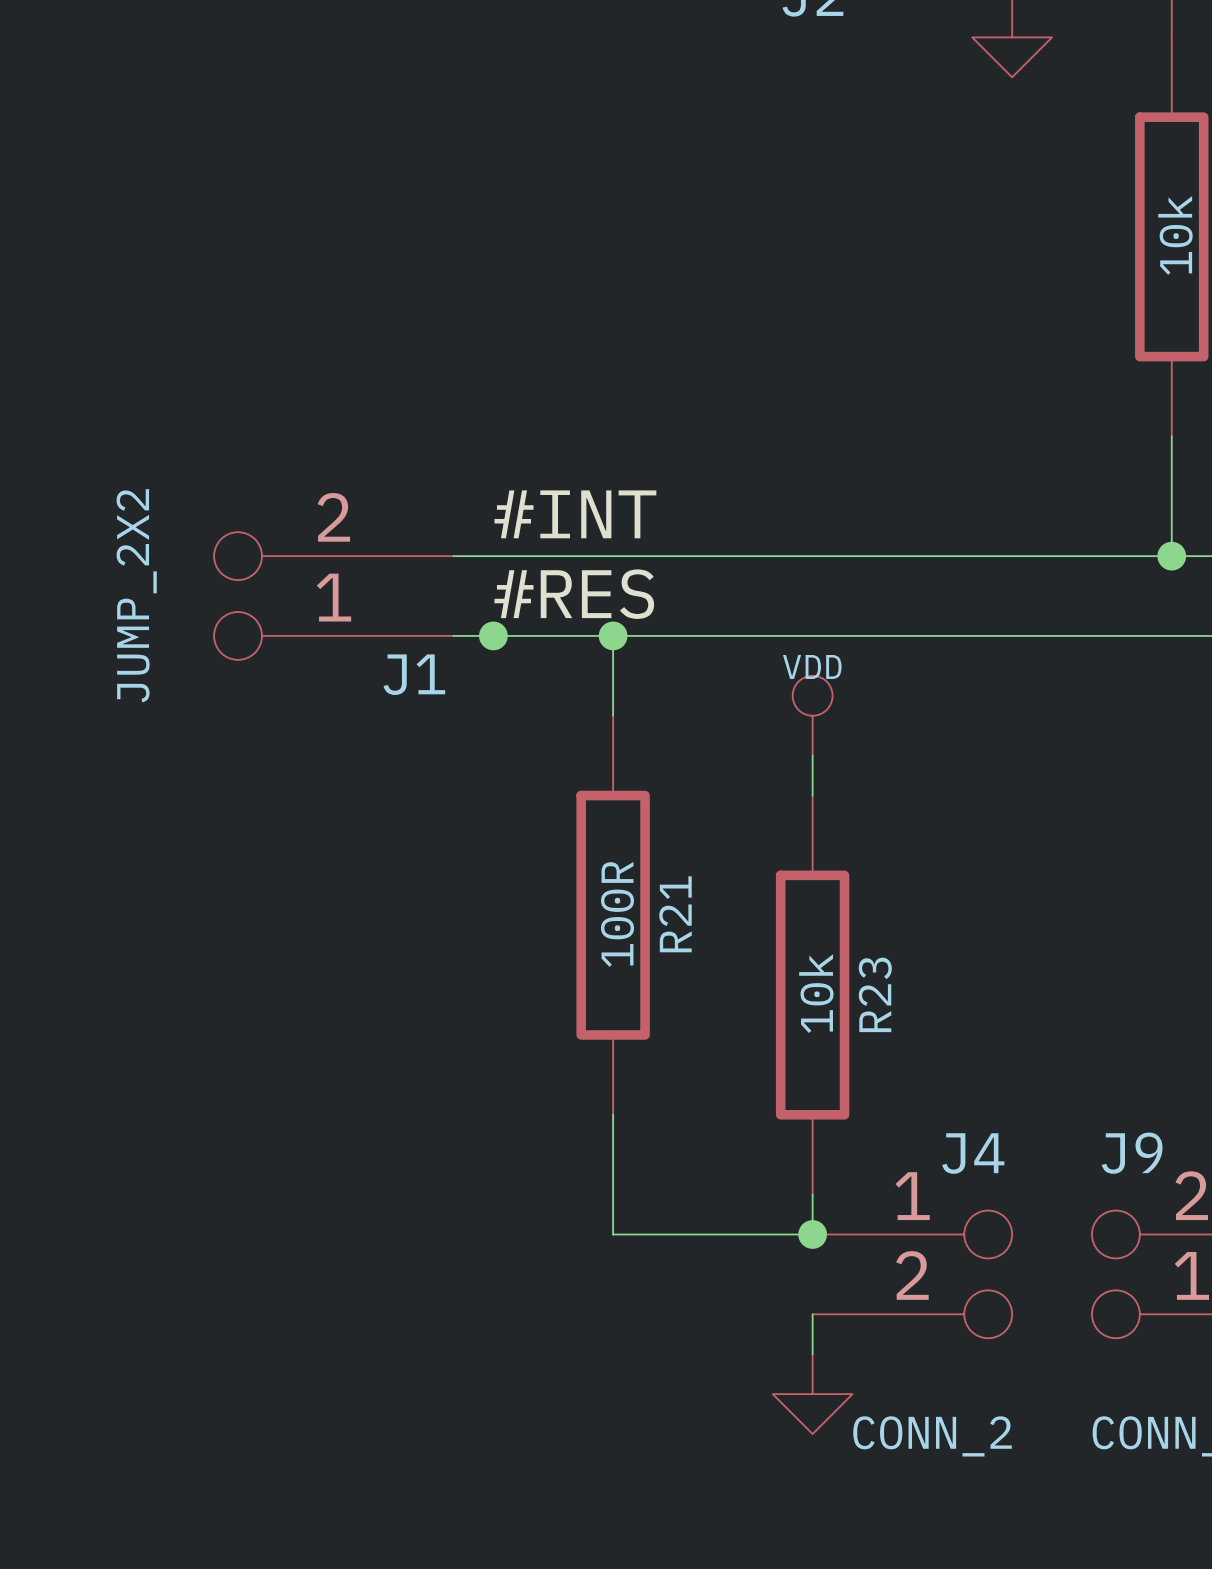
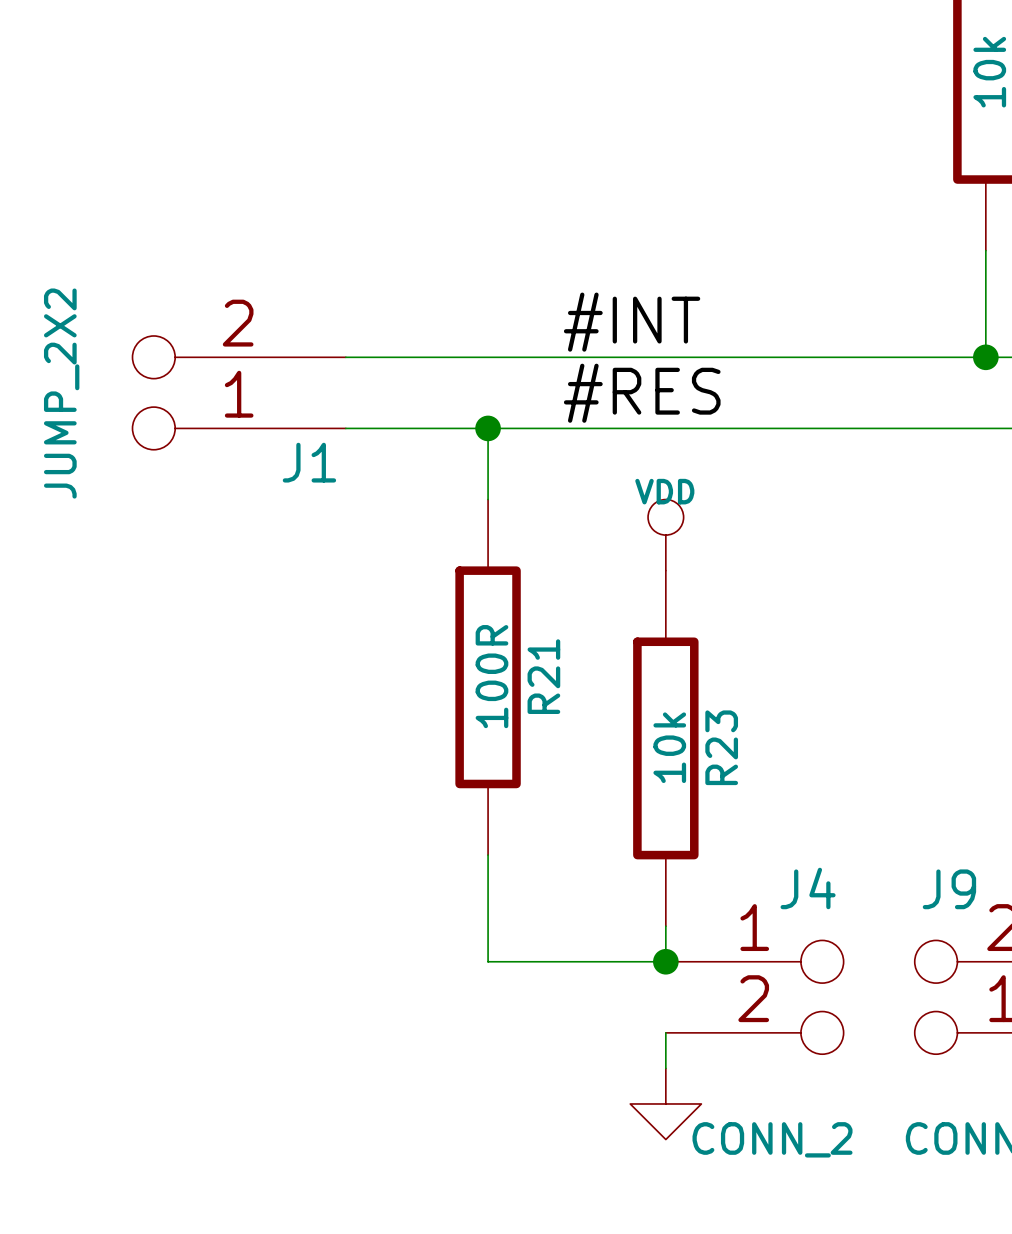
label position: #INT (575, 514) -> #INT (632, 322)
label position: #RES (574, 594) -> #RES (642, 393)
junction: (493, 635) -> none
power symbol position: VDD (812, 715) -> VDD (665, 535)

